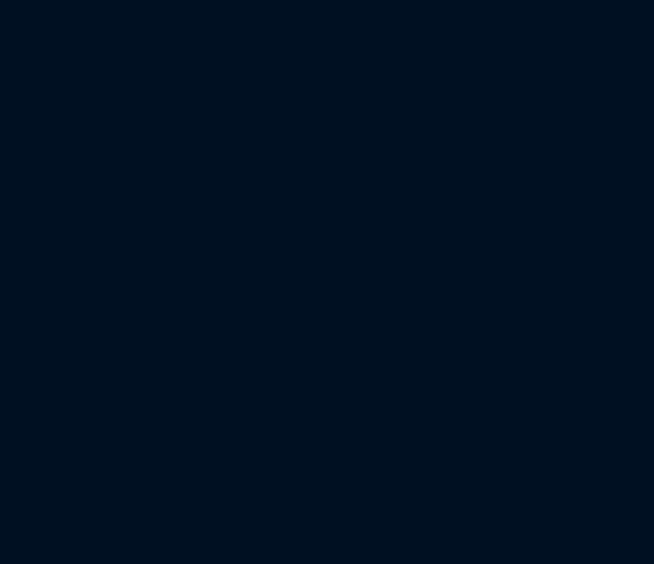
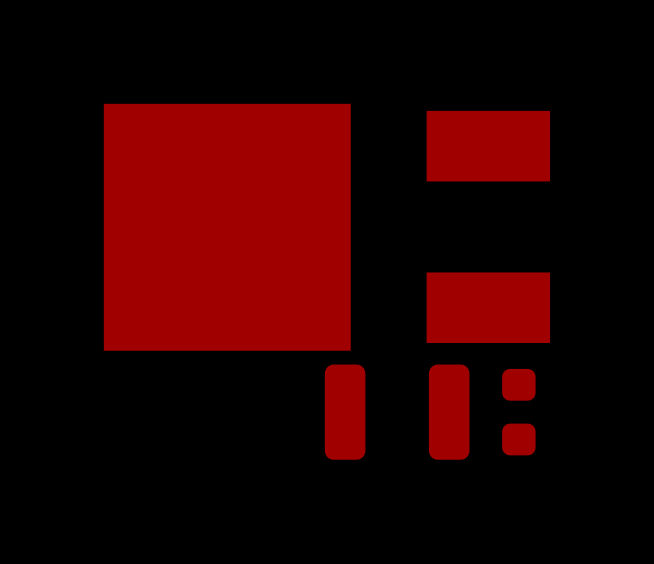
part: none -> (326, 227)
part: none -> (397, 412)
part: none -> (518, 412)

